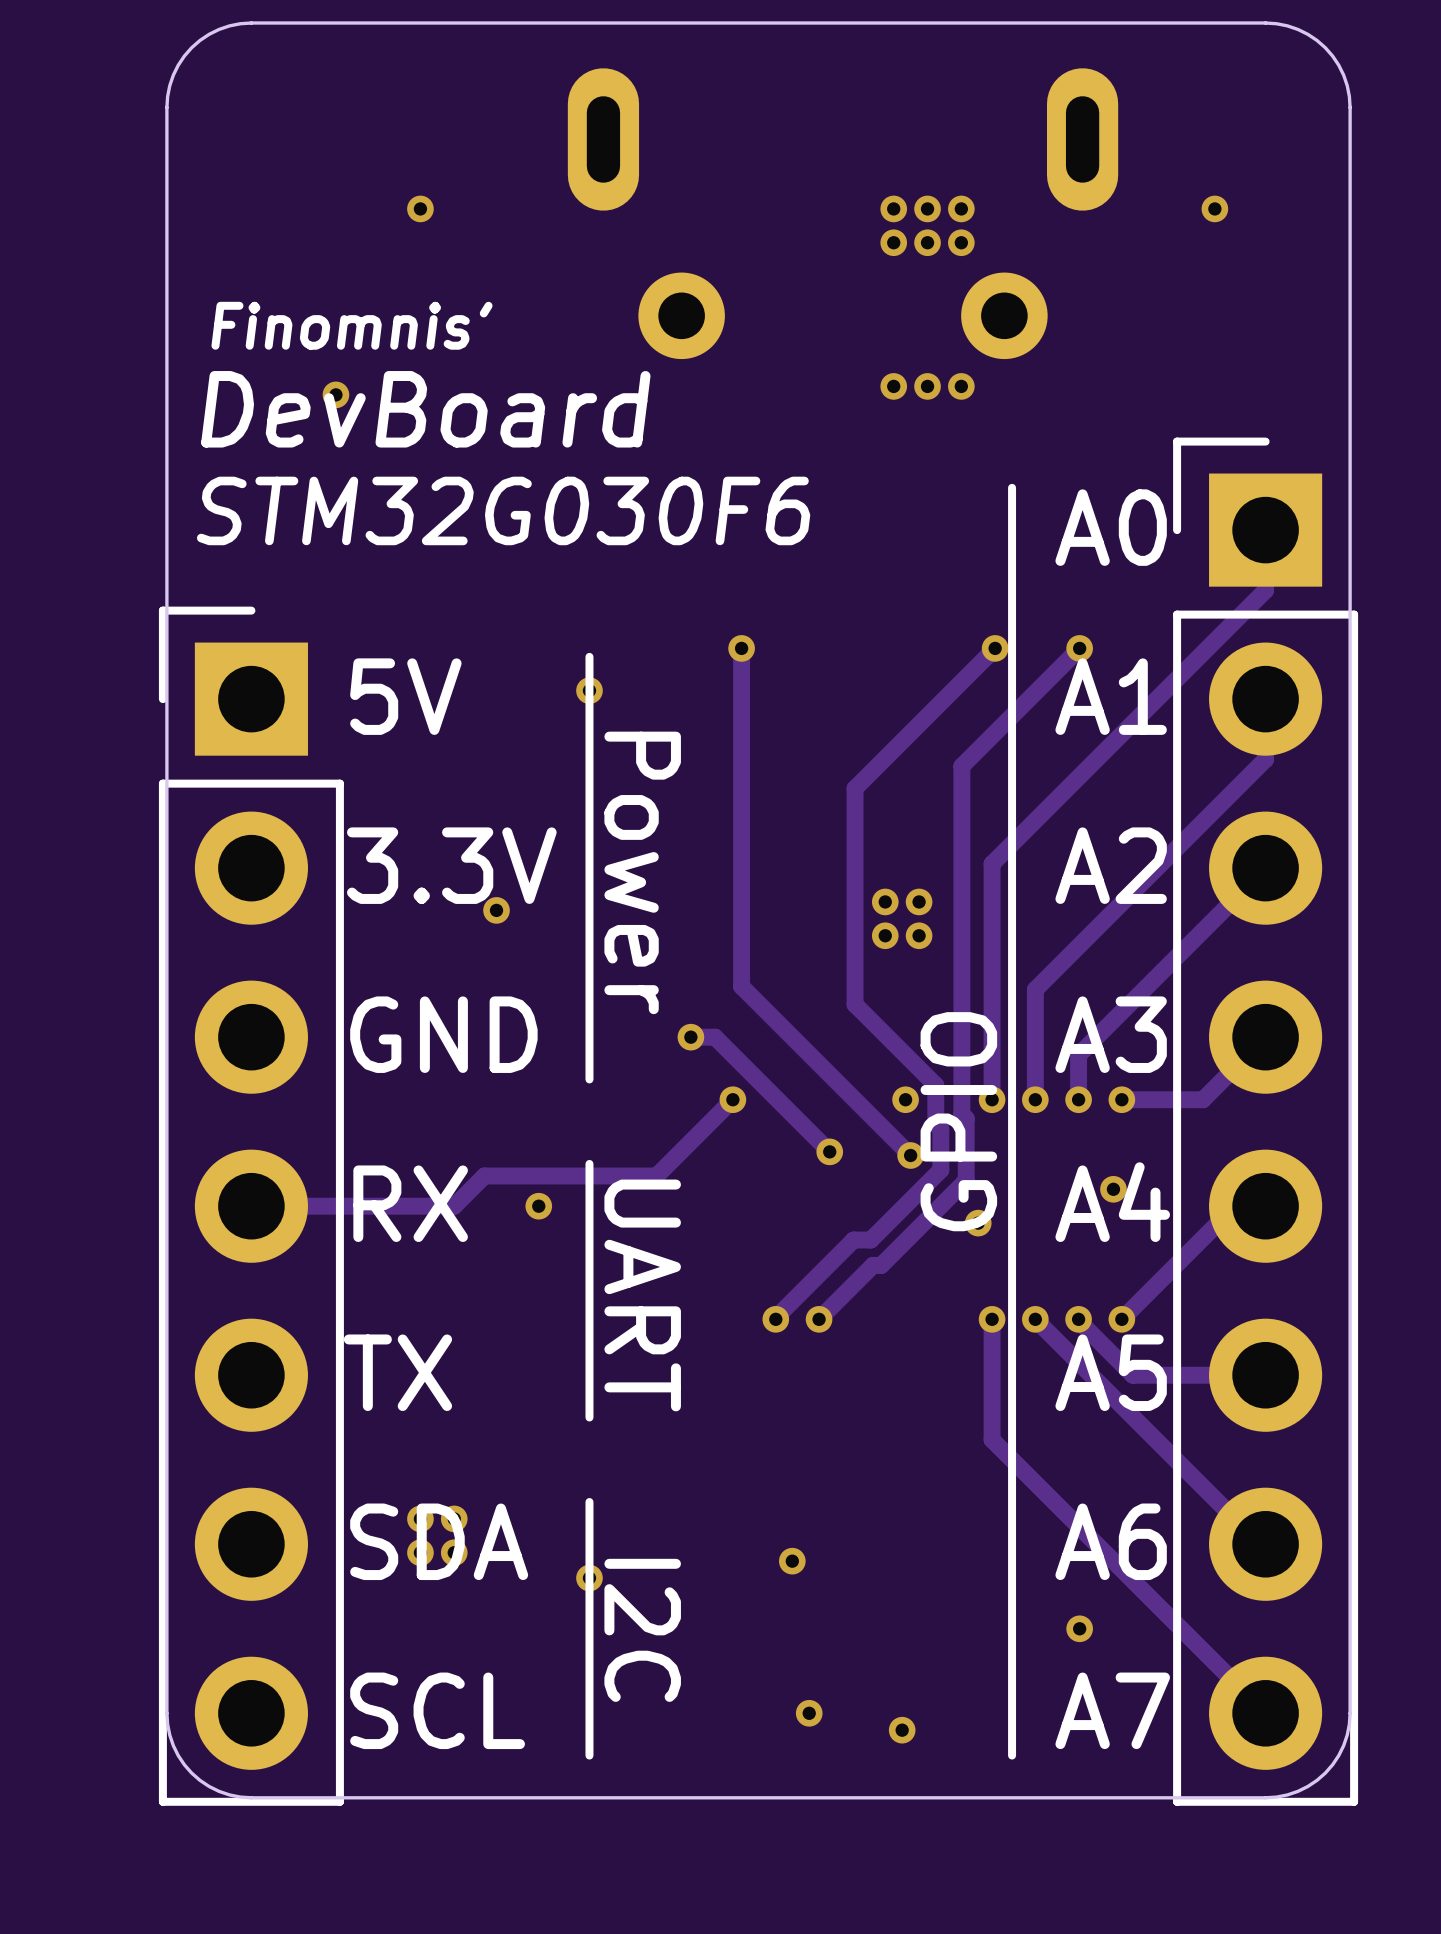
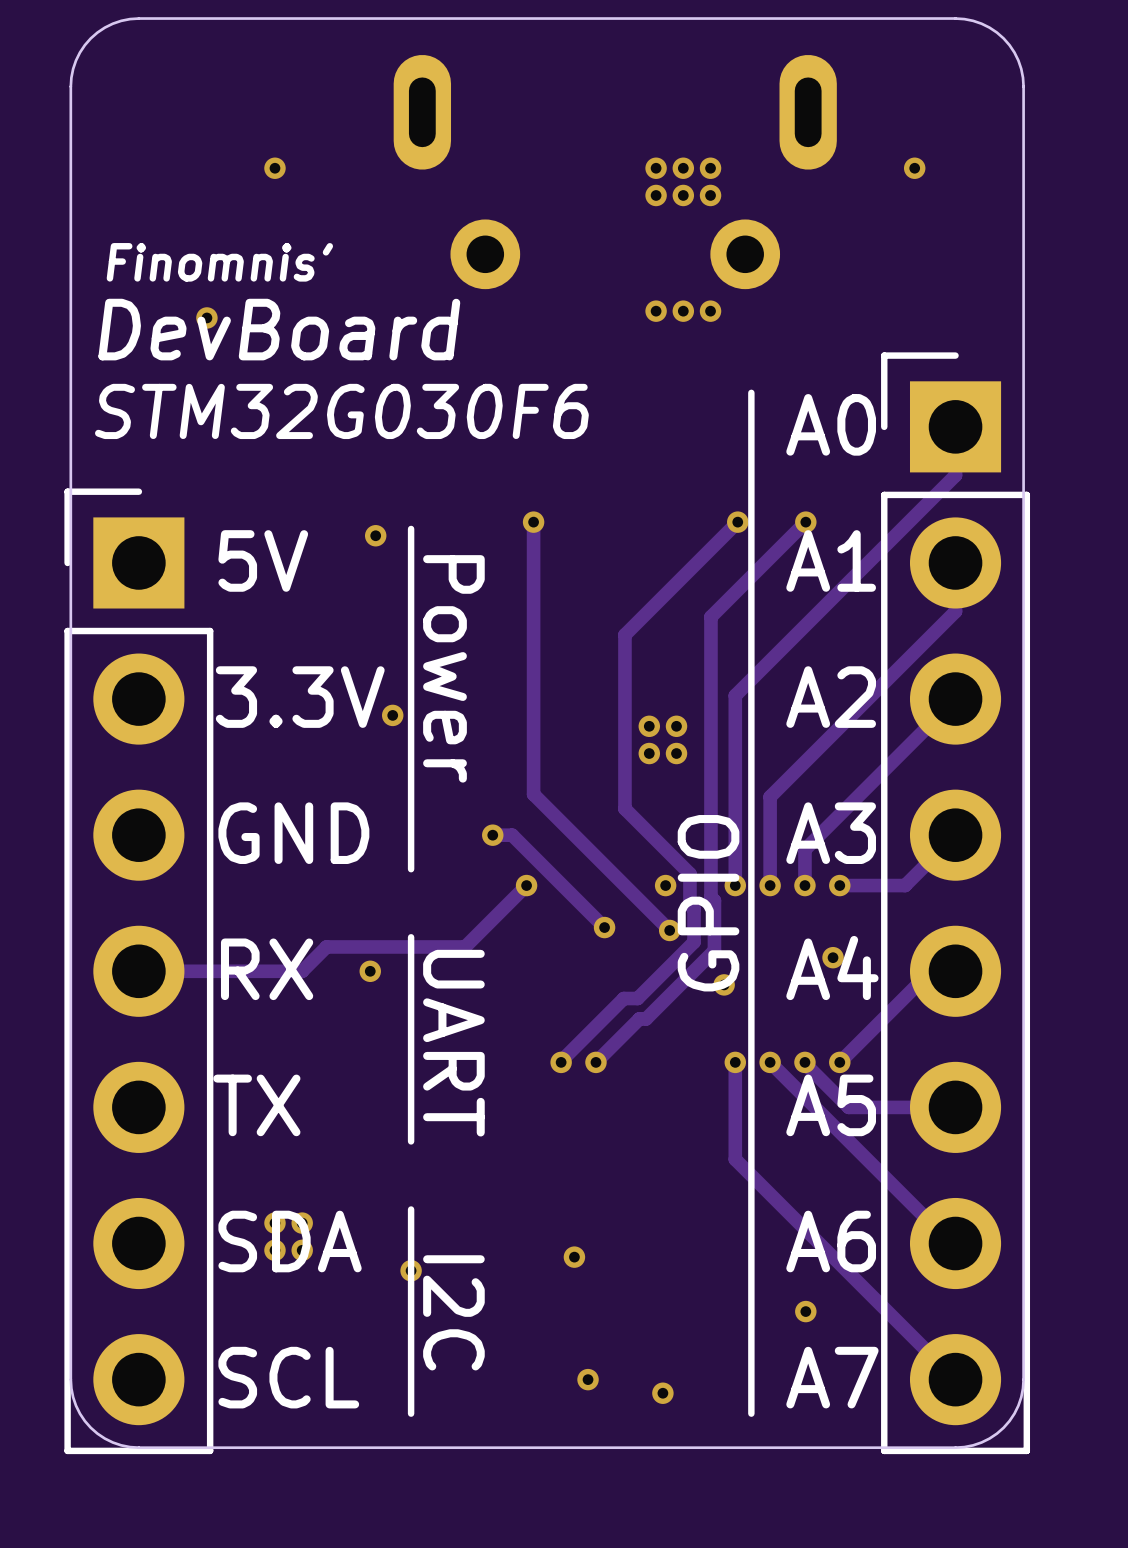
via position: (589, 690) -> (375, 535)
text position: Power (642, 872) -> Power (453, 668)
via position: (496, 910) -> (392, 715)

